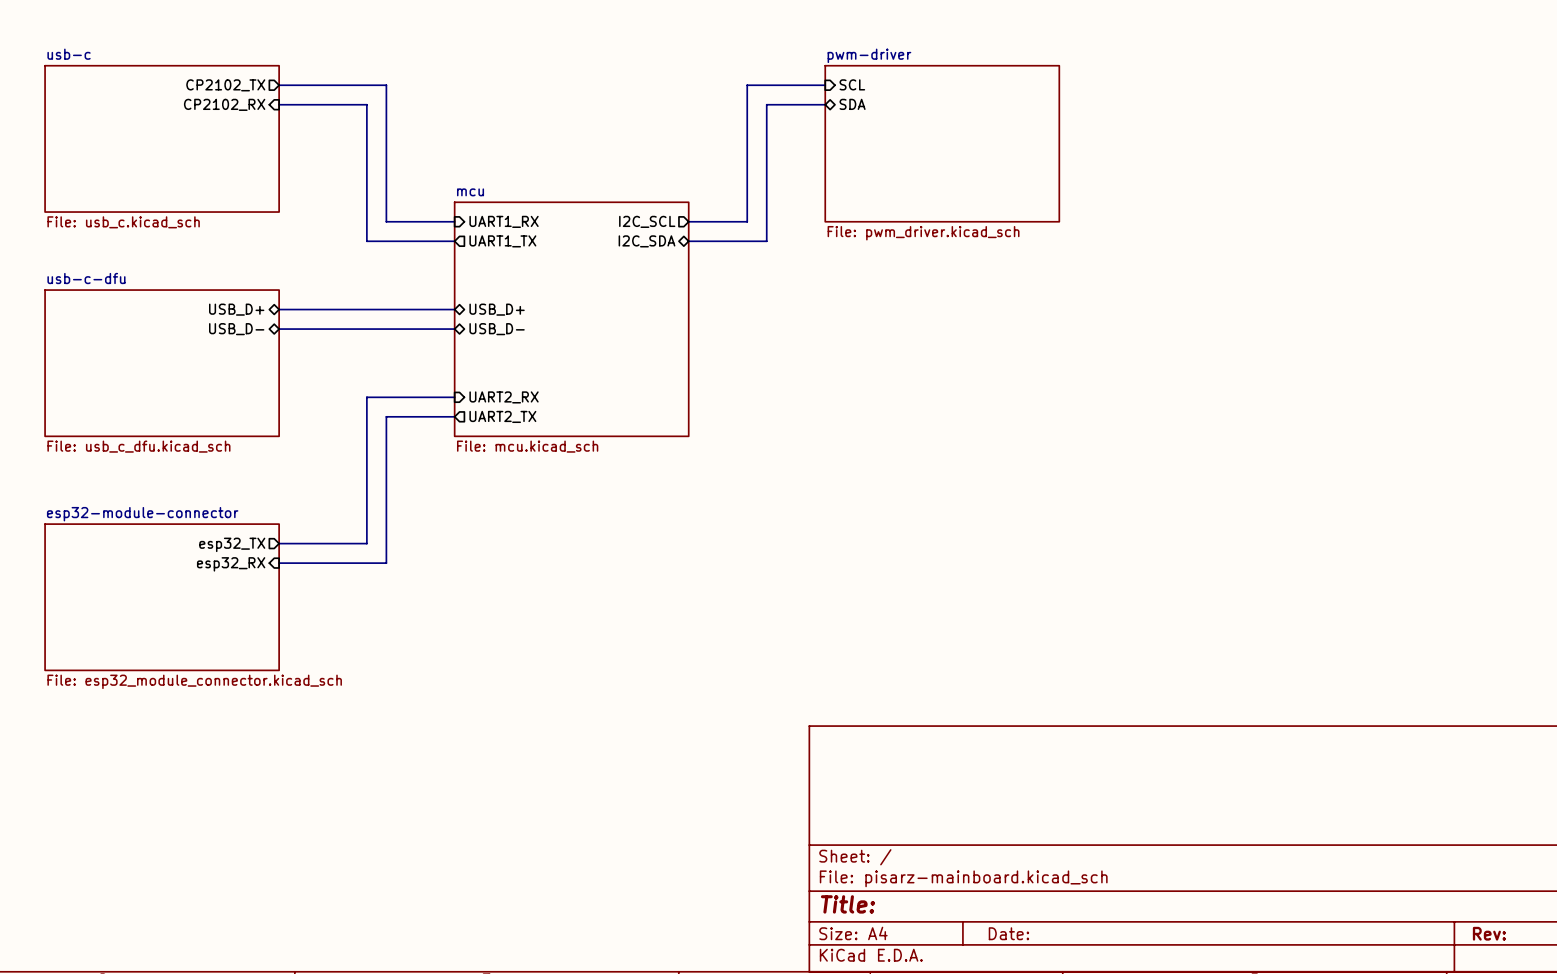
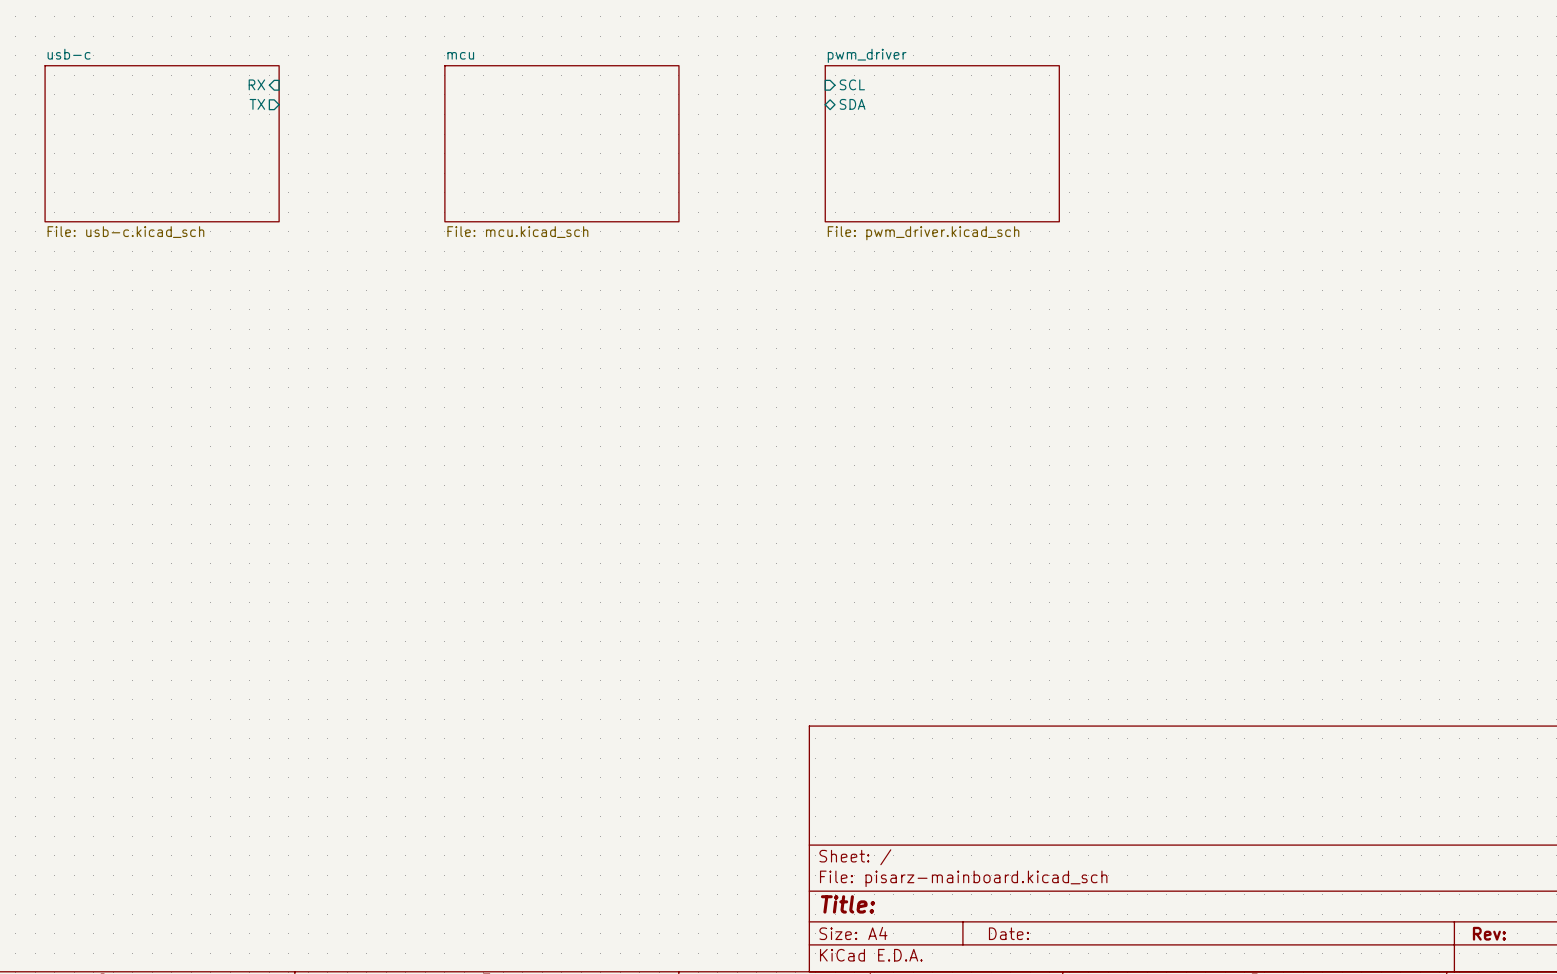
sheet pwm-driver name: pwm-driver (869, 55) -> pwm_driver (867, 55)
sheet usb-c shape: [44, 65, 280, 213] -> [44, 65, 280, 223]
sheet pin shape: output (225, 85) -> input (256, 84)
sheet pin: CP2102_TX (225, 85) -> RX (256, 84)
wire: (279, 85) (386, 85) (386, 221) (454, 221) -> none
wire: (825, 85) (747, 85) (747, 221) (688, 221) -> none
sheet pin shape: input (224, 104) -> output (257, 104)
sheet pin: CP2102_RX (224, 104) -> TX (257, 104)
wire: (279, 104) (366, 104) (366, 241) (454, 241) -> none
wire: (825, 104) (766, 104) (766, 241) (688, 241) -> none
sheet mcu: none -> File: mcu.kicad_sch (561, 143)
sheet pin: UART1_RX (504, 221) -> none
sheet pin: I2C_SCL (647, 221) -> none
sheet usb-c value: File: usb_c.kicad_sch (123, 222) -> File: usb-c.kicad_sch (125, 232)
sheet pin: UART1_TX (502, 241) -> none
sheet pin: I2C_SDA (647, 241) -> none
sheet pin: USB_D+ (236, 309) -> none
wire: (279, 309) (454, 309) -> none
sheet pin: USB_D+ (497, 309) -> none
sheet mcu: File: mcu.kicad_sch (571, 319) -> none
sheet pin: USB_D- (236, 329) -> none
wire: (279, 329) (454, 329) -> none
sheet pin: USB_D- (497, 329) -> none
sheet usb-c-dfu: File: usb_c_dfu.kicad_sch (162, 363) -> none
wire: (454, 397) (366, 397) (366, 543) (279, 543) -> none
sheet pin: UART2_RX (504, 397) -> none
wire: (454, 416) (386, 416) (386, 563) (279, 563) -> none
sheet pin: UART2_TX (502, 416) -> none
sheet pin: esp32_TX (232, 544) -> none
sheet pin: esp32_RX (231, 564) -> none
sheet esp32-module-connector: File: esp32_module_connector.kicad_sch (162, 597) -> none

